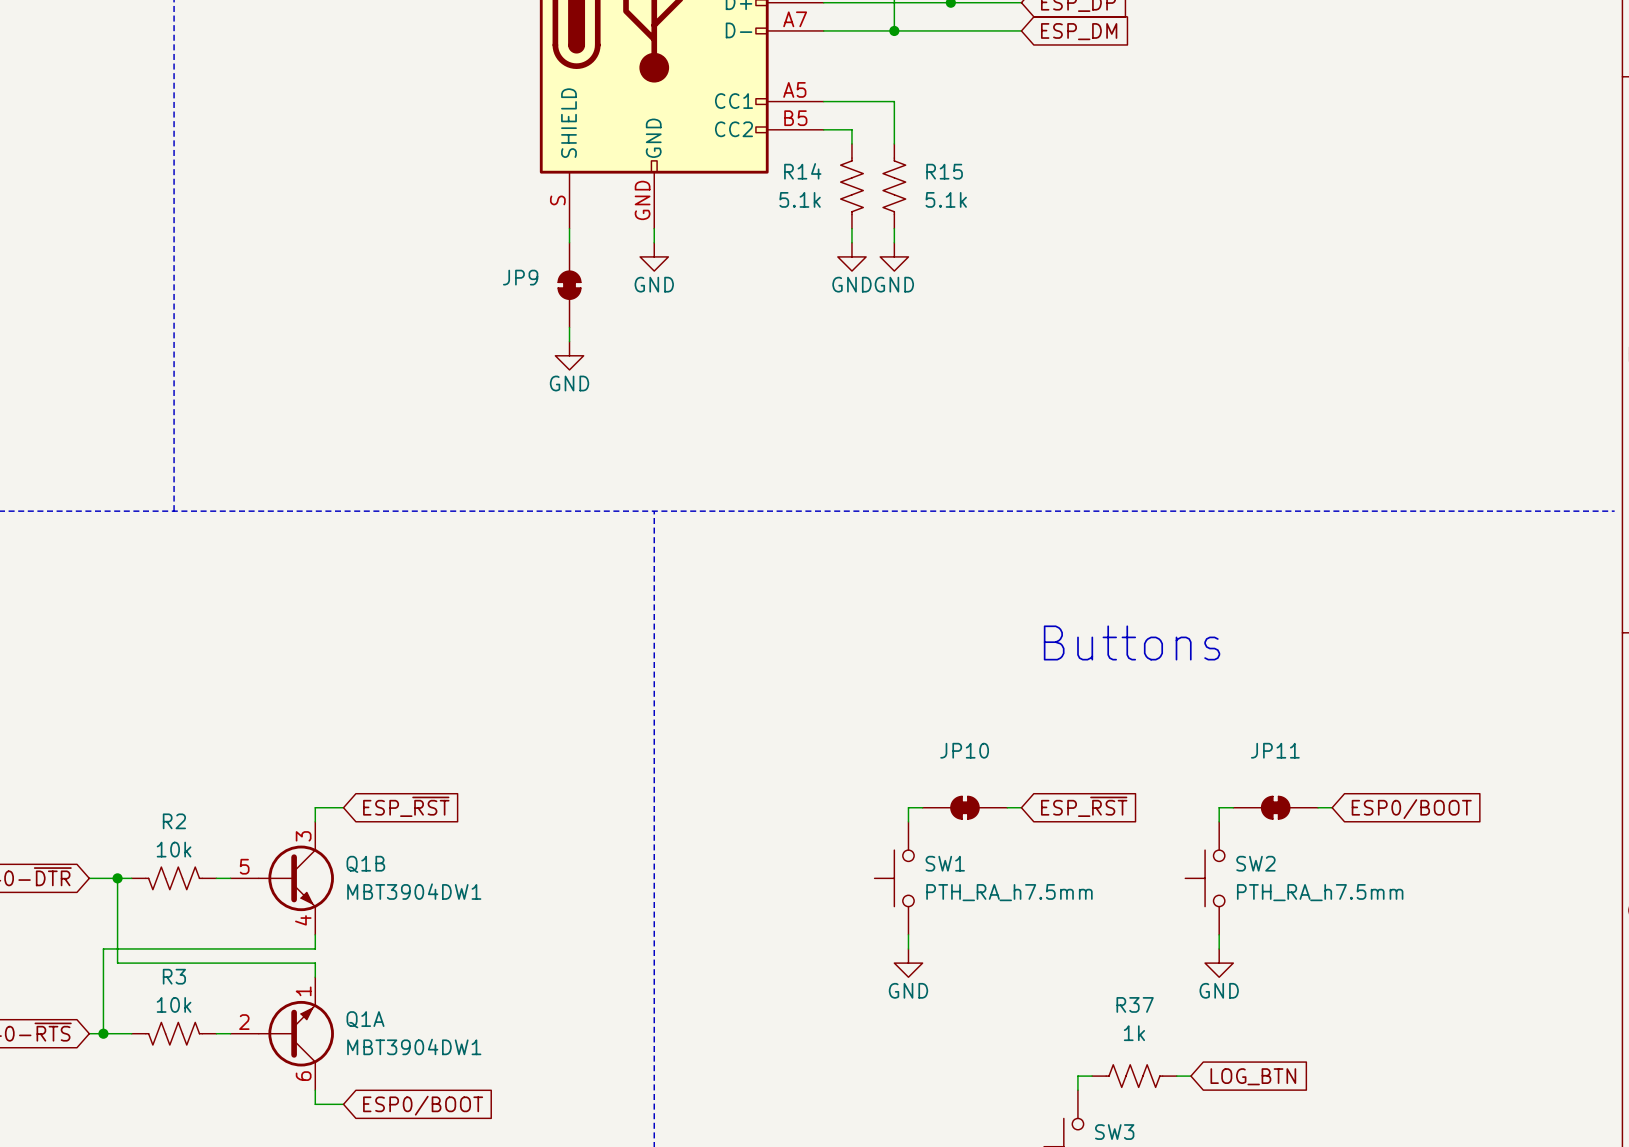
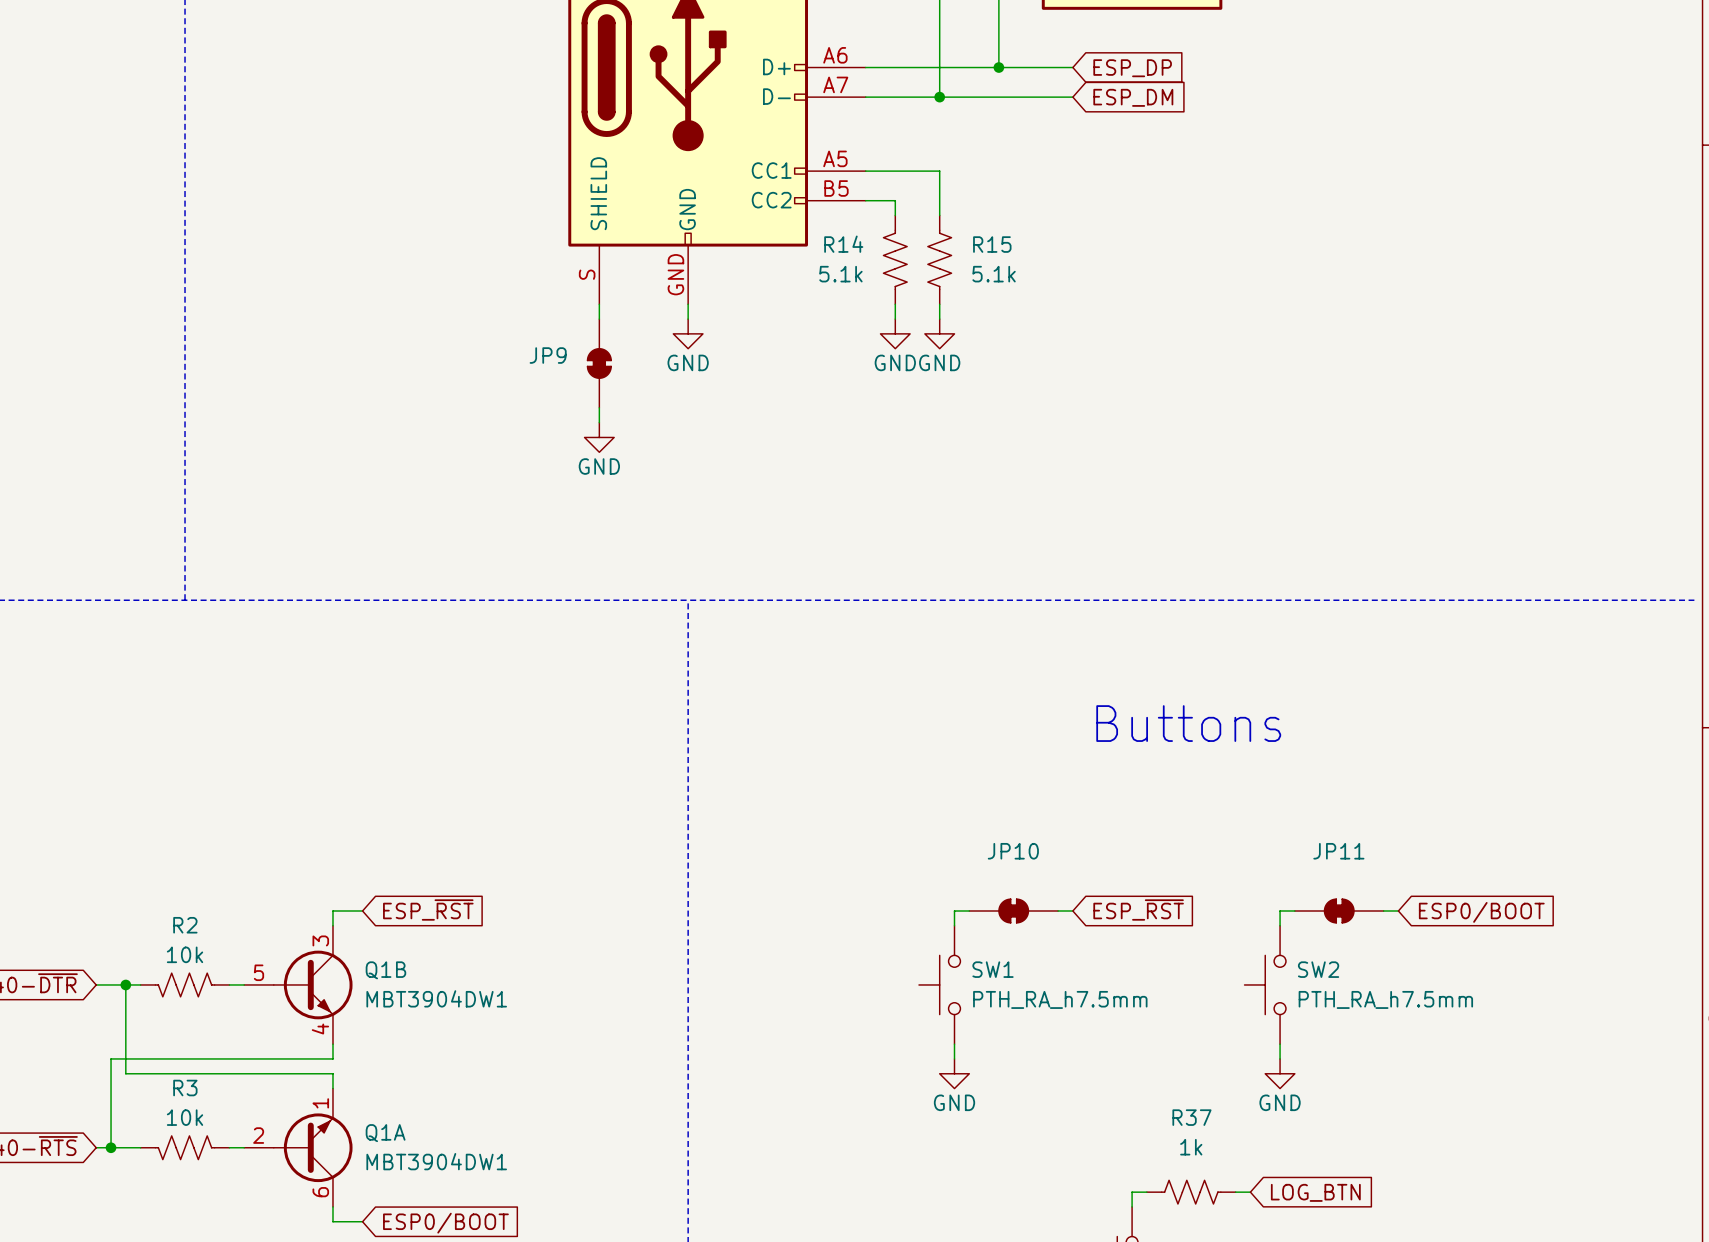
text position: Buttons (1132, 642) -> Buttons (1188, 723)

